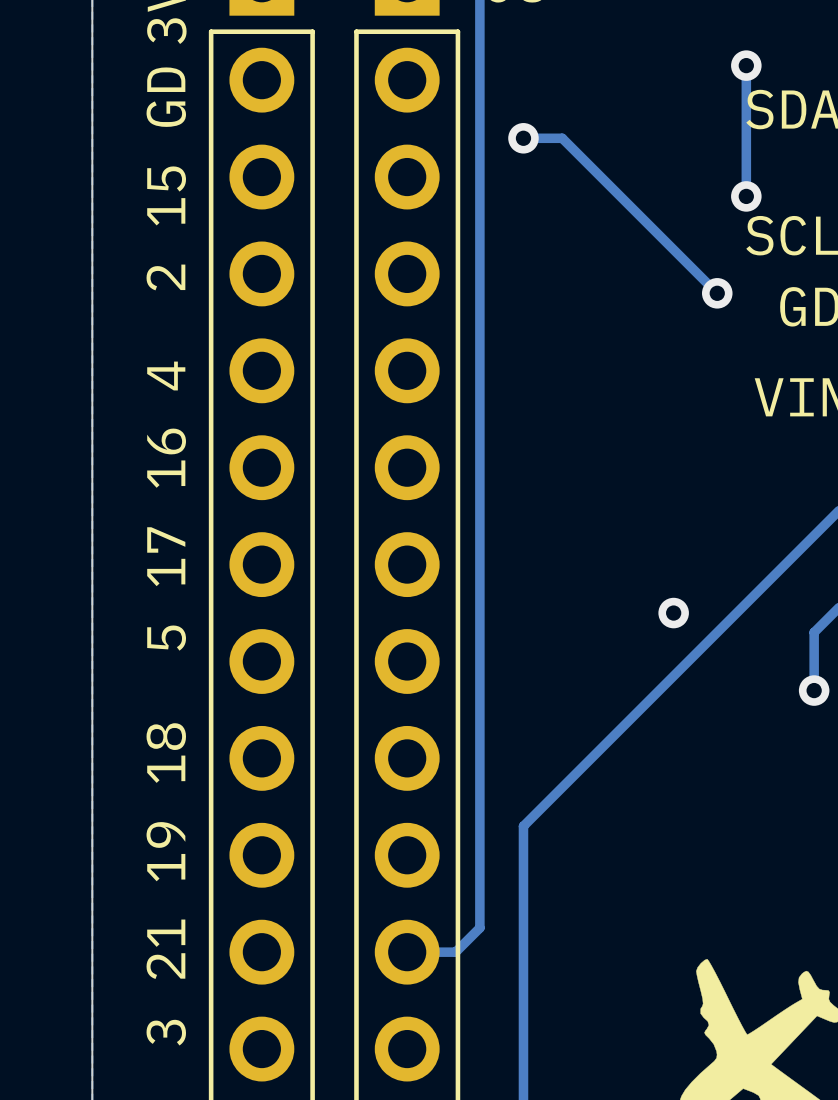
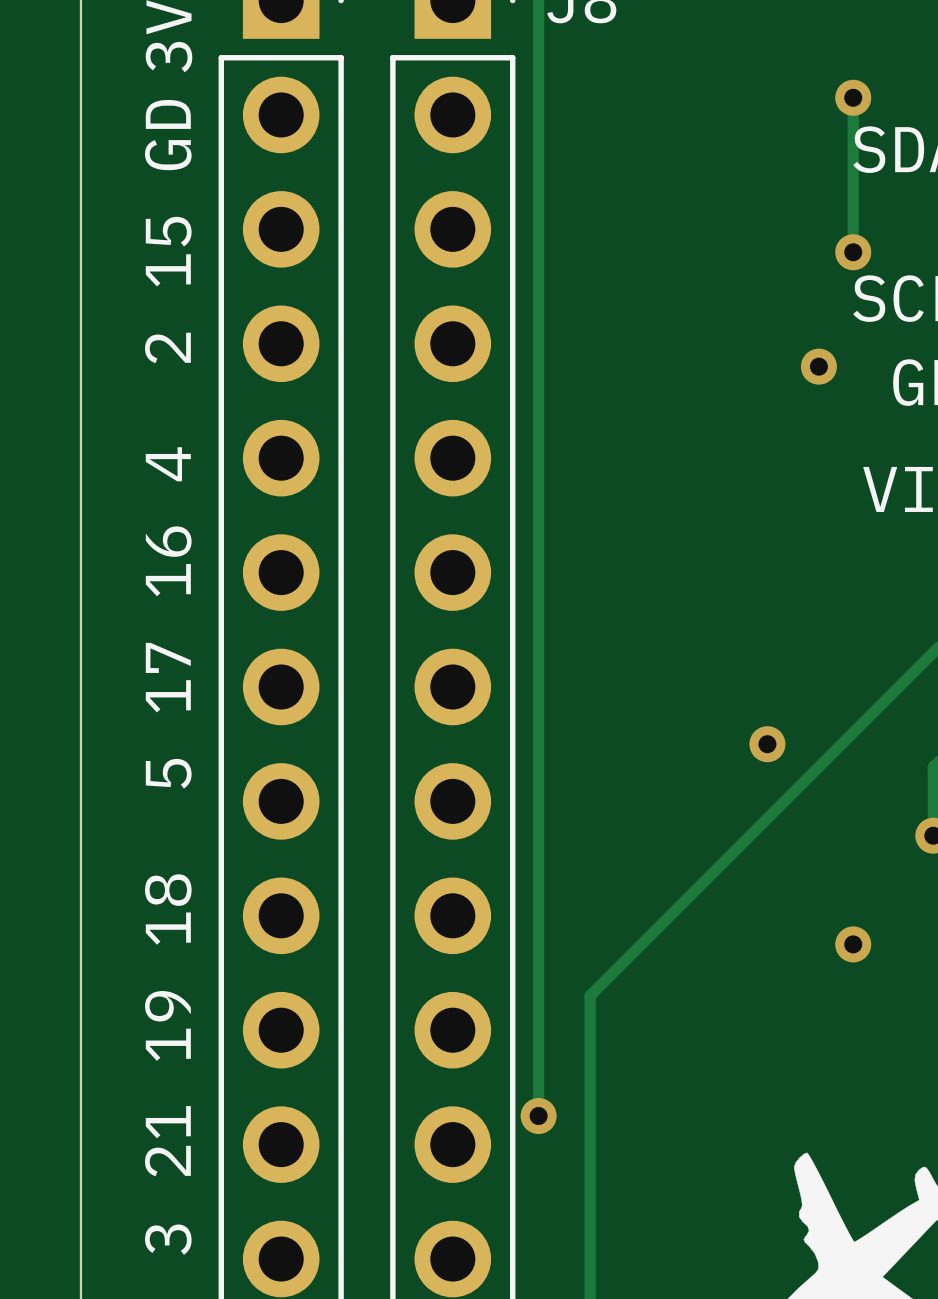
track: (523, 138) (562, 138) (717, 293) -> none
via: (523, 138) -> none
via: none -> (853, 944)
track: (479, 927) (455, 952) (407, 952) -> none
via: none -> (538, 1116)

